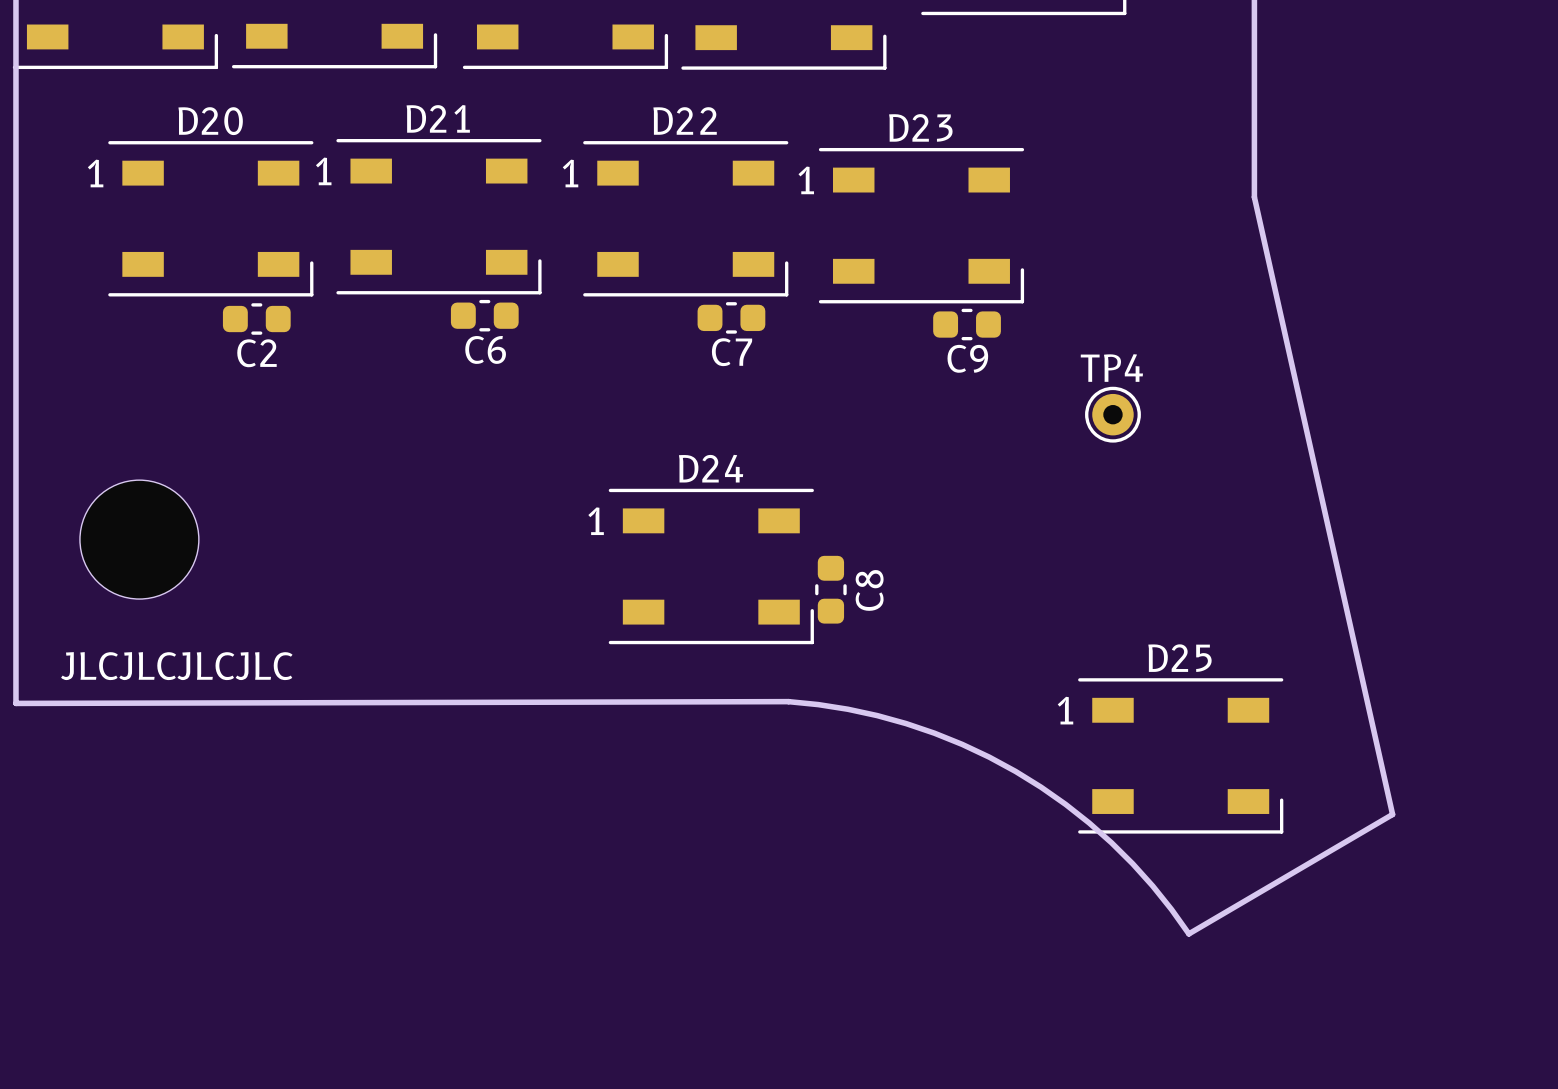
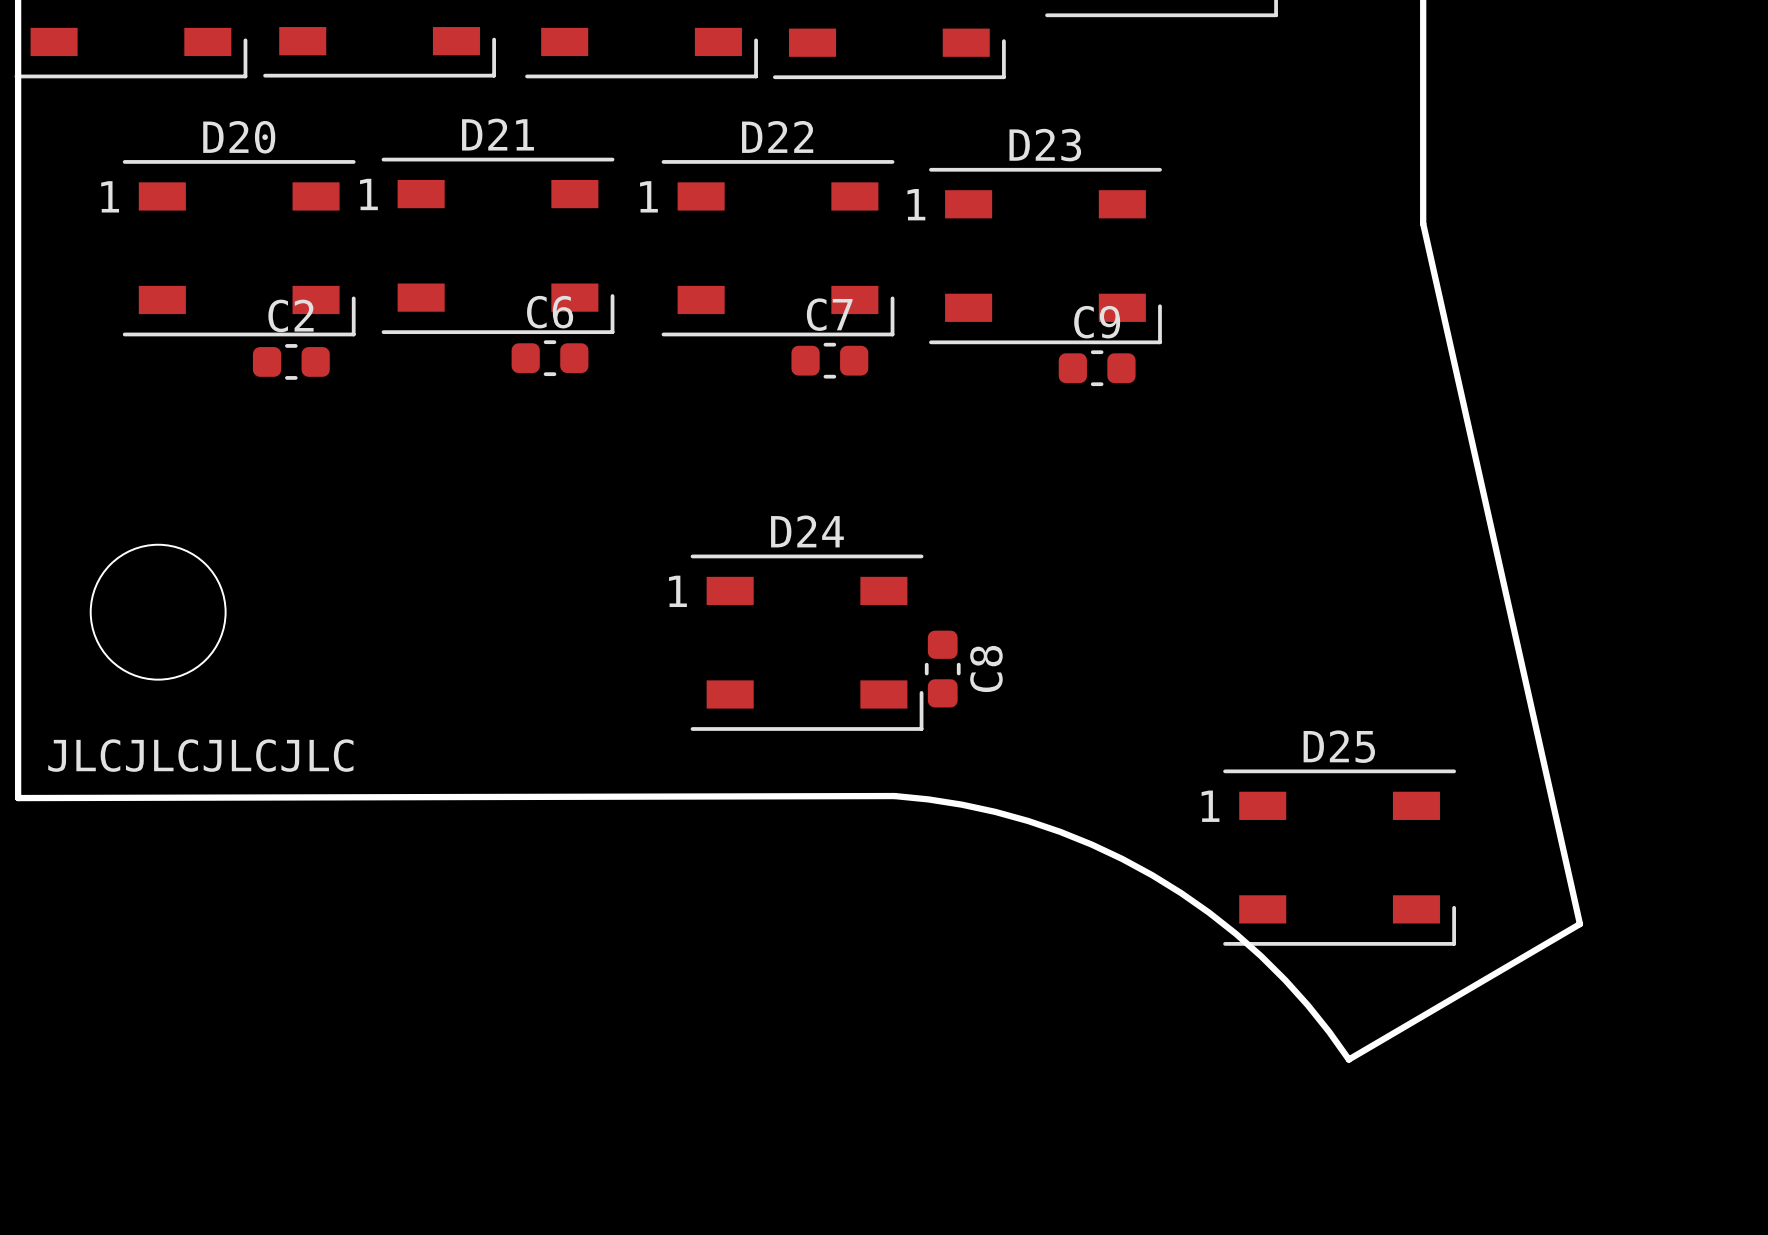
C6 name position: C6 (485, 349) -> C6 (550, 312)
C7 name position: C7 (732, 352) -> C7 (829, 314)
C2 name position: C2 (256, 353) -> C2 (290, 315)
C9 name position: C9 (967, 358) -> C9 (1097, 322)
part: (1112, 414) -> none

